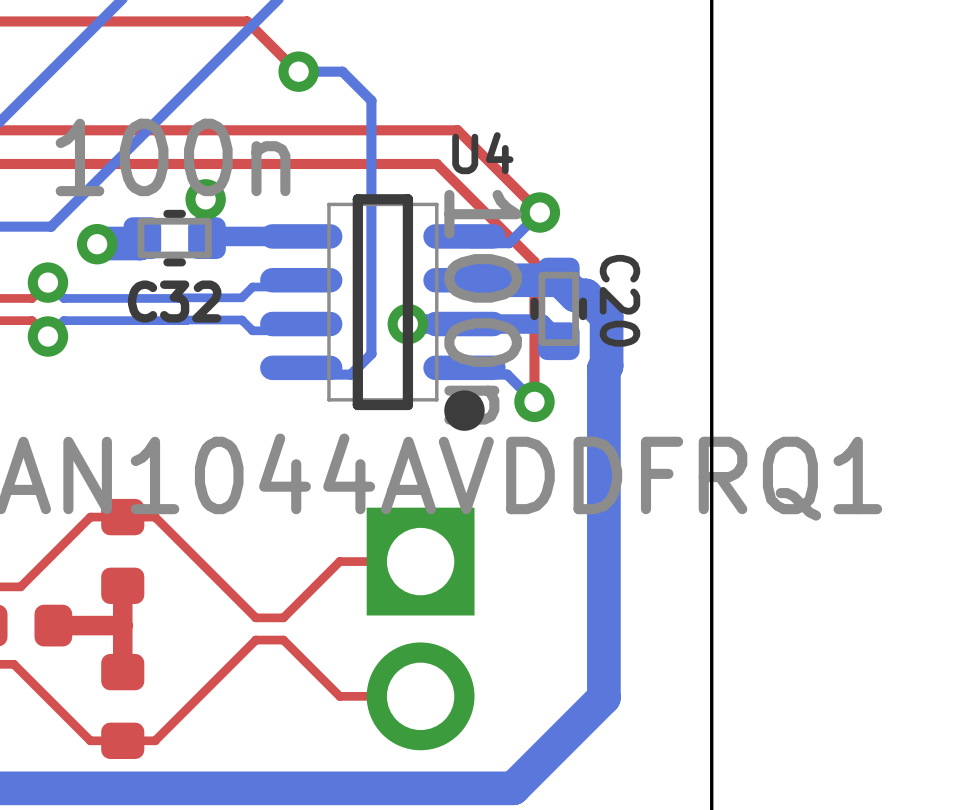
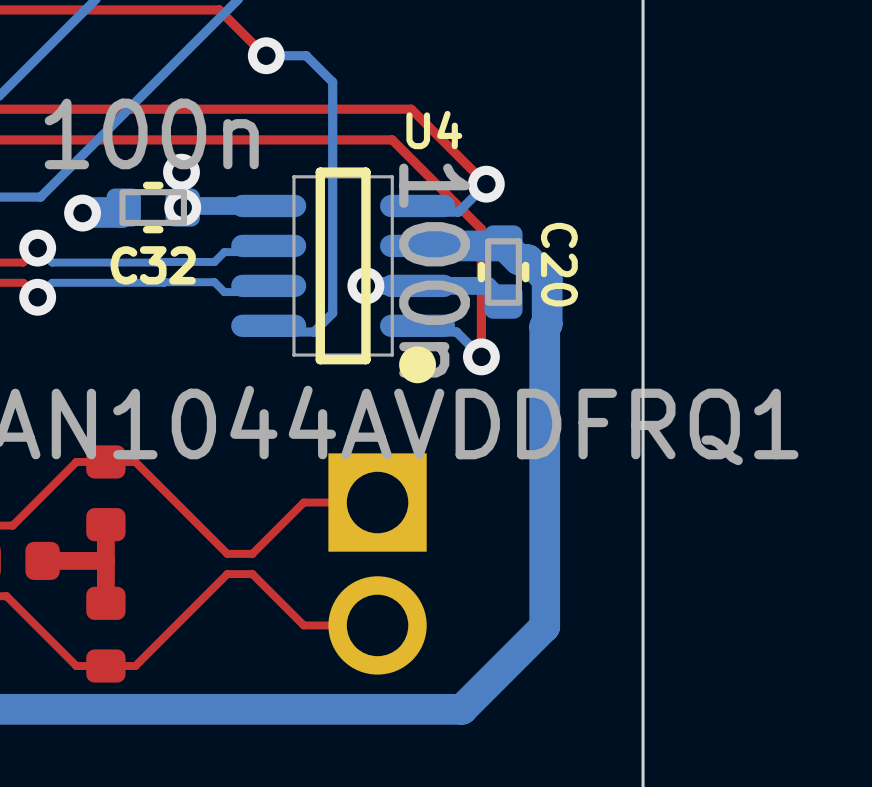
via: none -> (182, 207)

